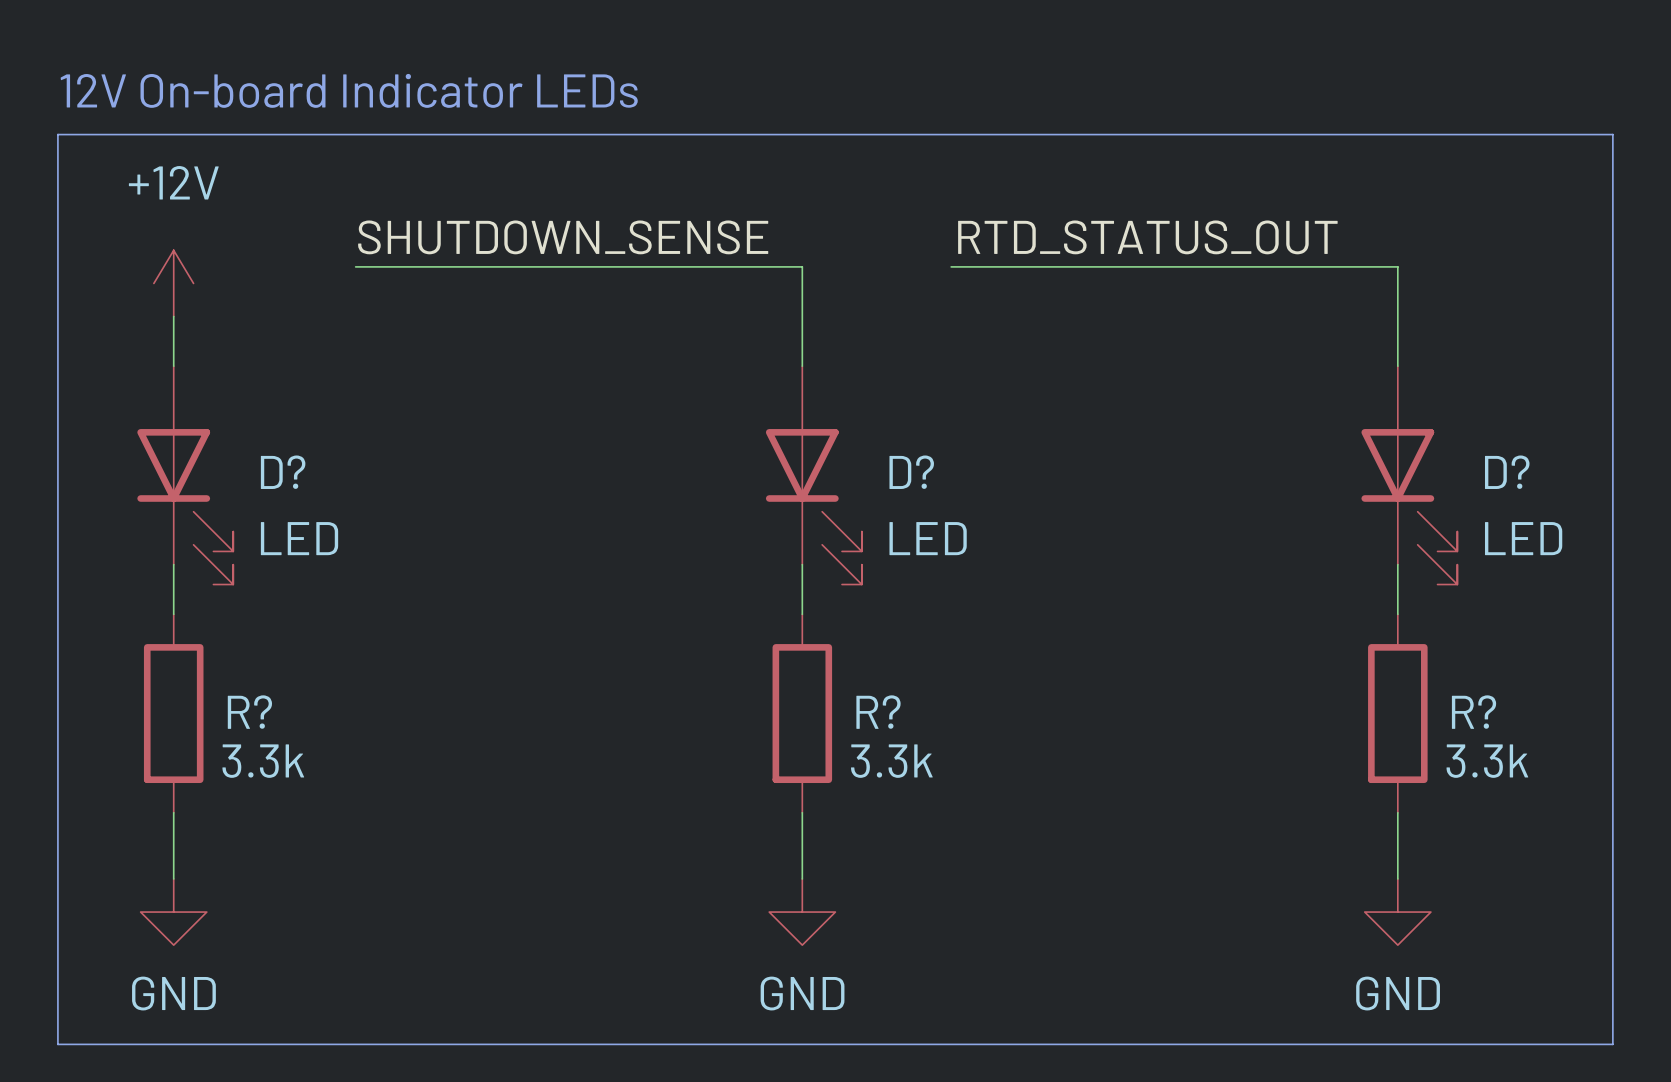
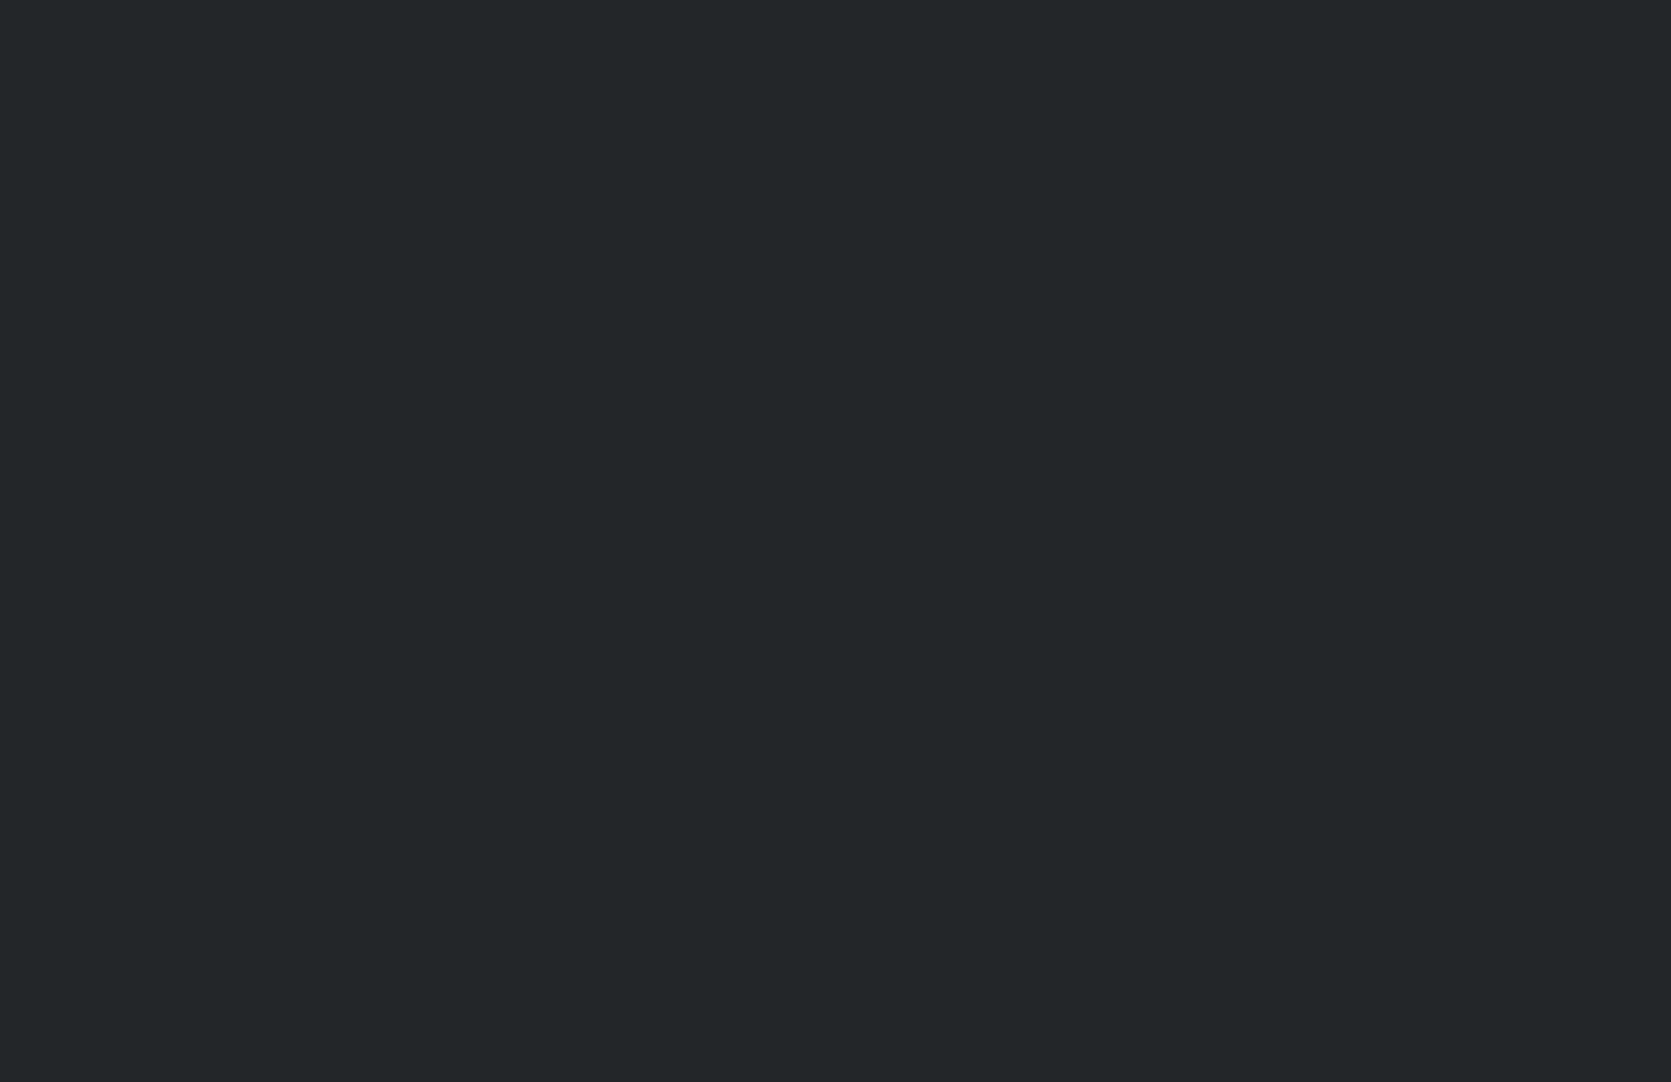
text: 12V On-board Indicator LEDs (349, 90) -> none
line: (57, 134) (1612, 134) (1612, 1044) (57, 1044) (57, 134) -> none
label: SHUTDOWN_SENSE (563, 237) -> none
label: RTD_STATUS_OUT (1147, 237) -> none
wire: (355, 266) (802, 266) (802, 366) -> none
wire: (951, 266) (1397, 266) (1397, 366) -> none
power symbol: +12V (173, 283) -> none
wire: (173, 316) (173, 366) -> none
D?: LED (185, 475) -> none
D?: LED (813, 475) -> none
D?: LED (1409, 475) -> none
wire: (173, 564) (173, 614) -> none
wire: (802, 564) (802, 614) -> none
wire: (1397, 564) (1397, 614) -> none
R?: 3.3k (173, 713) -> none
R?: 3.3k (802, 713) -> none
R?: 3.3k (1397, 713) -> none
wire: (173, 812) (173, 878) -> none
wire: (802, 812) (802, 878) -> none
wire: (1397, 812) (1397, 878) -> none
power symbol: GND (173, 912) -> none
power symbol: GND (802, 912) -> none
power symbol: GND (1397, 912) -> none

